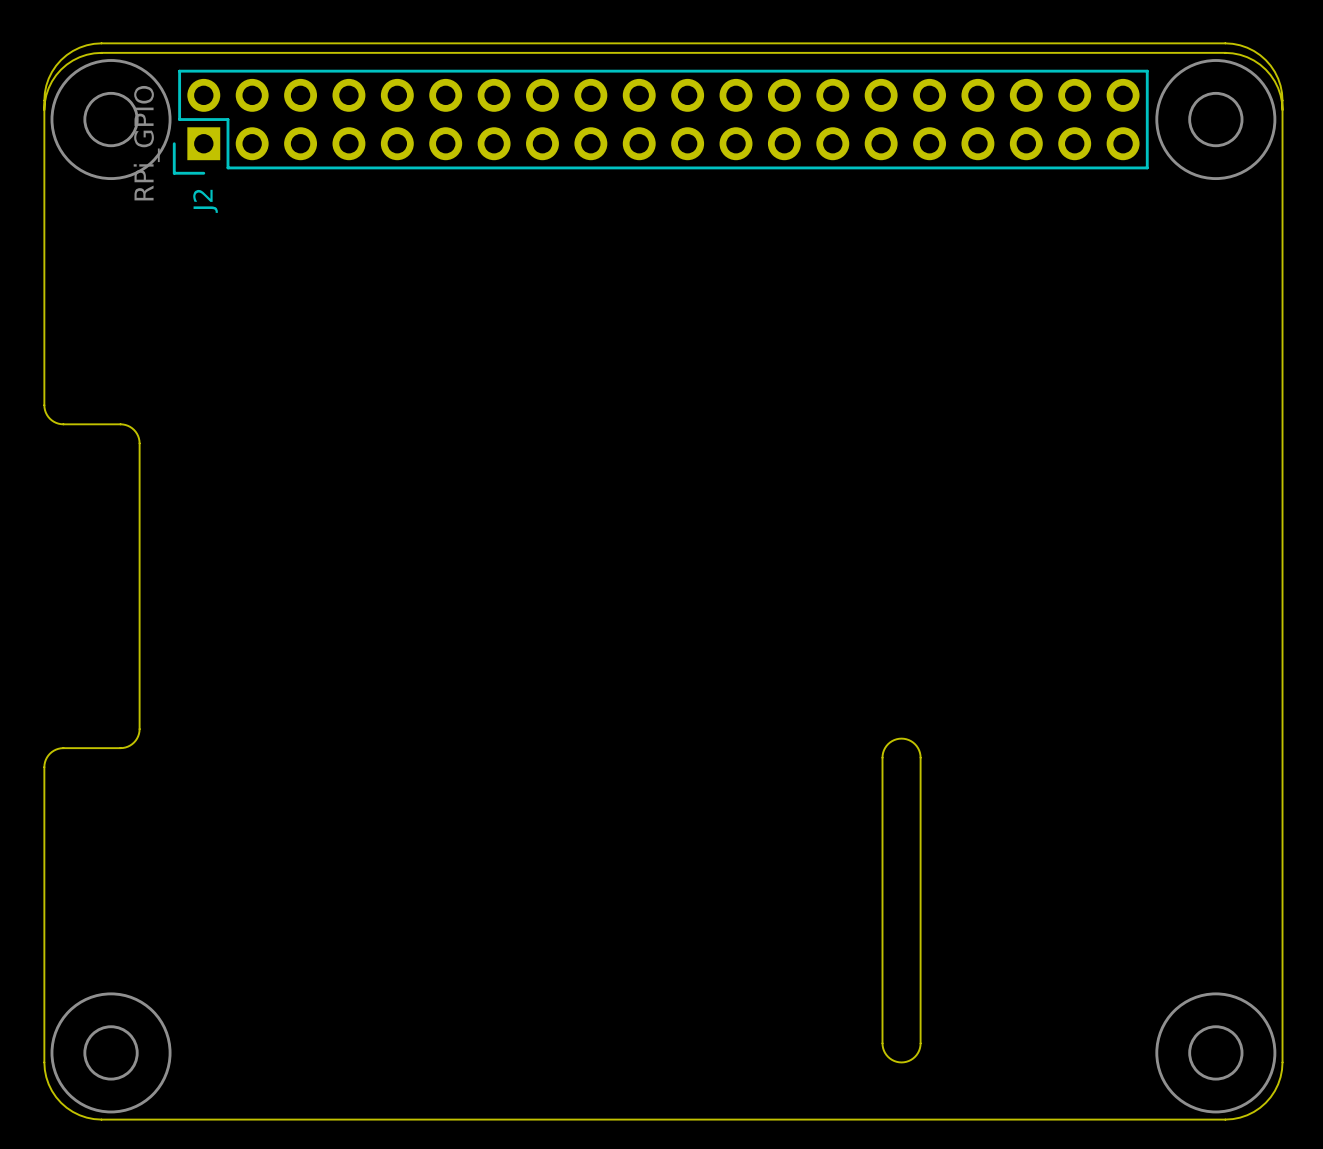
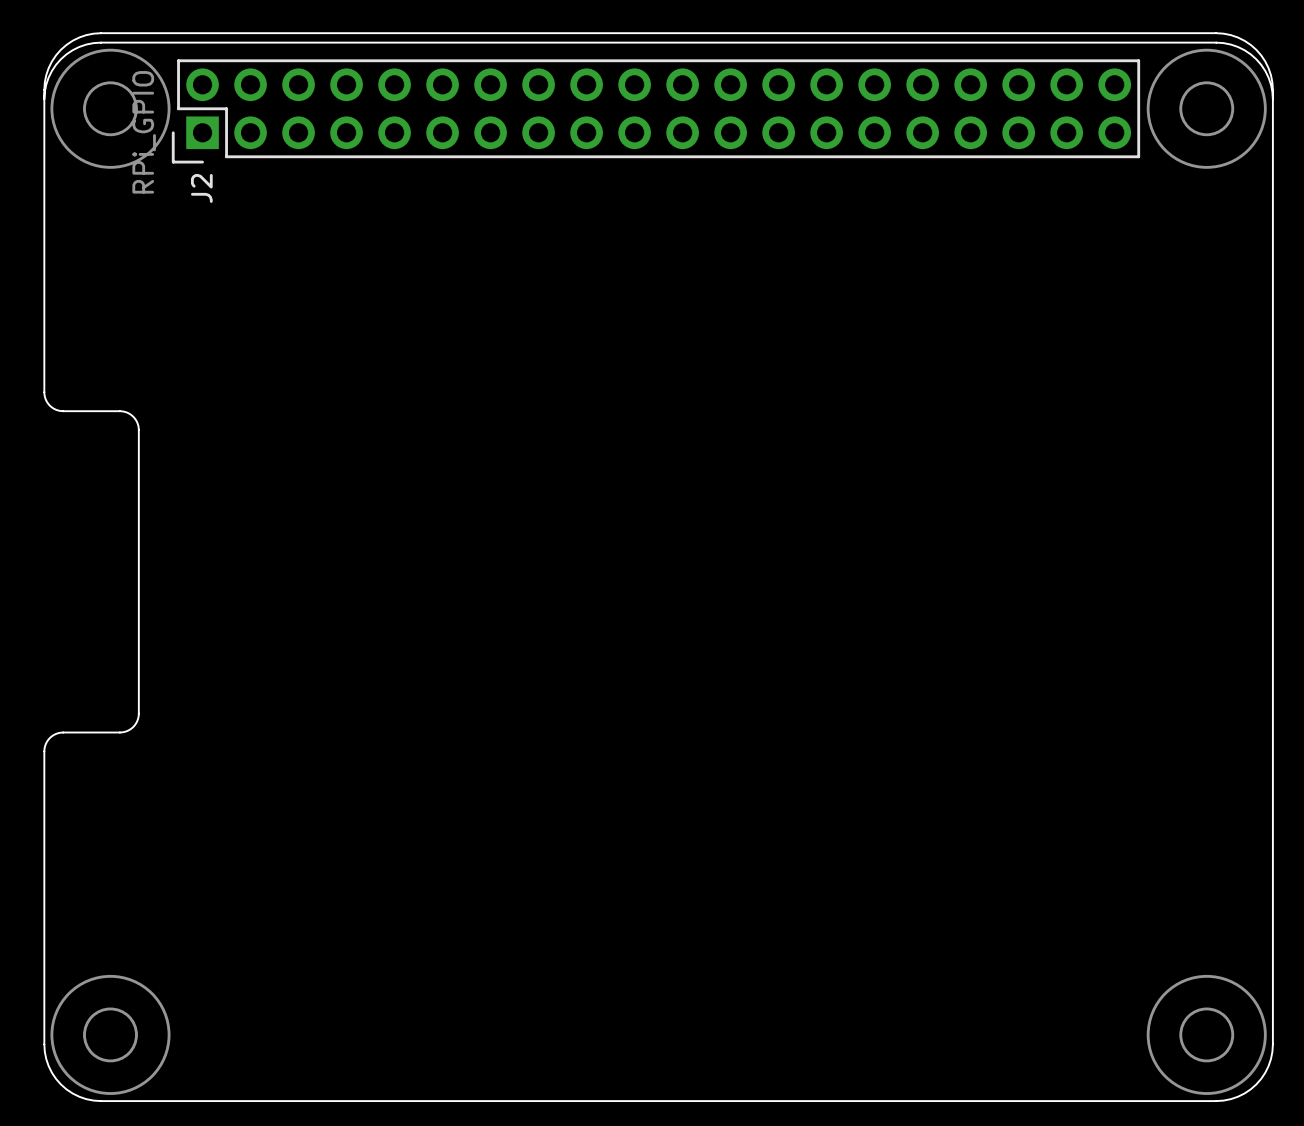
board edge: (882, 757) (882, 1045) (889, 1058) (904, 1062) (916, 1054) (920, 1043) (920, 755) (913, 742) (901, 738) (888, 744) (882, 757) -> none

